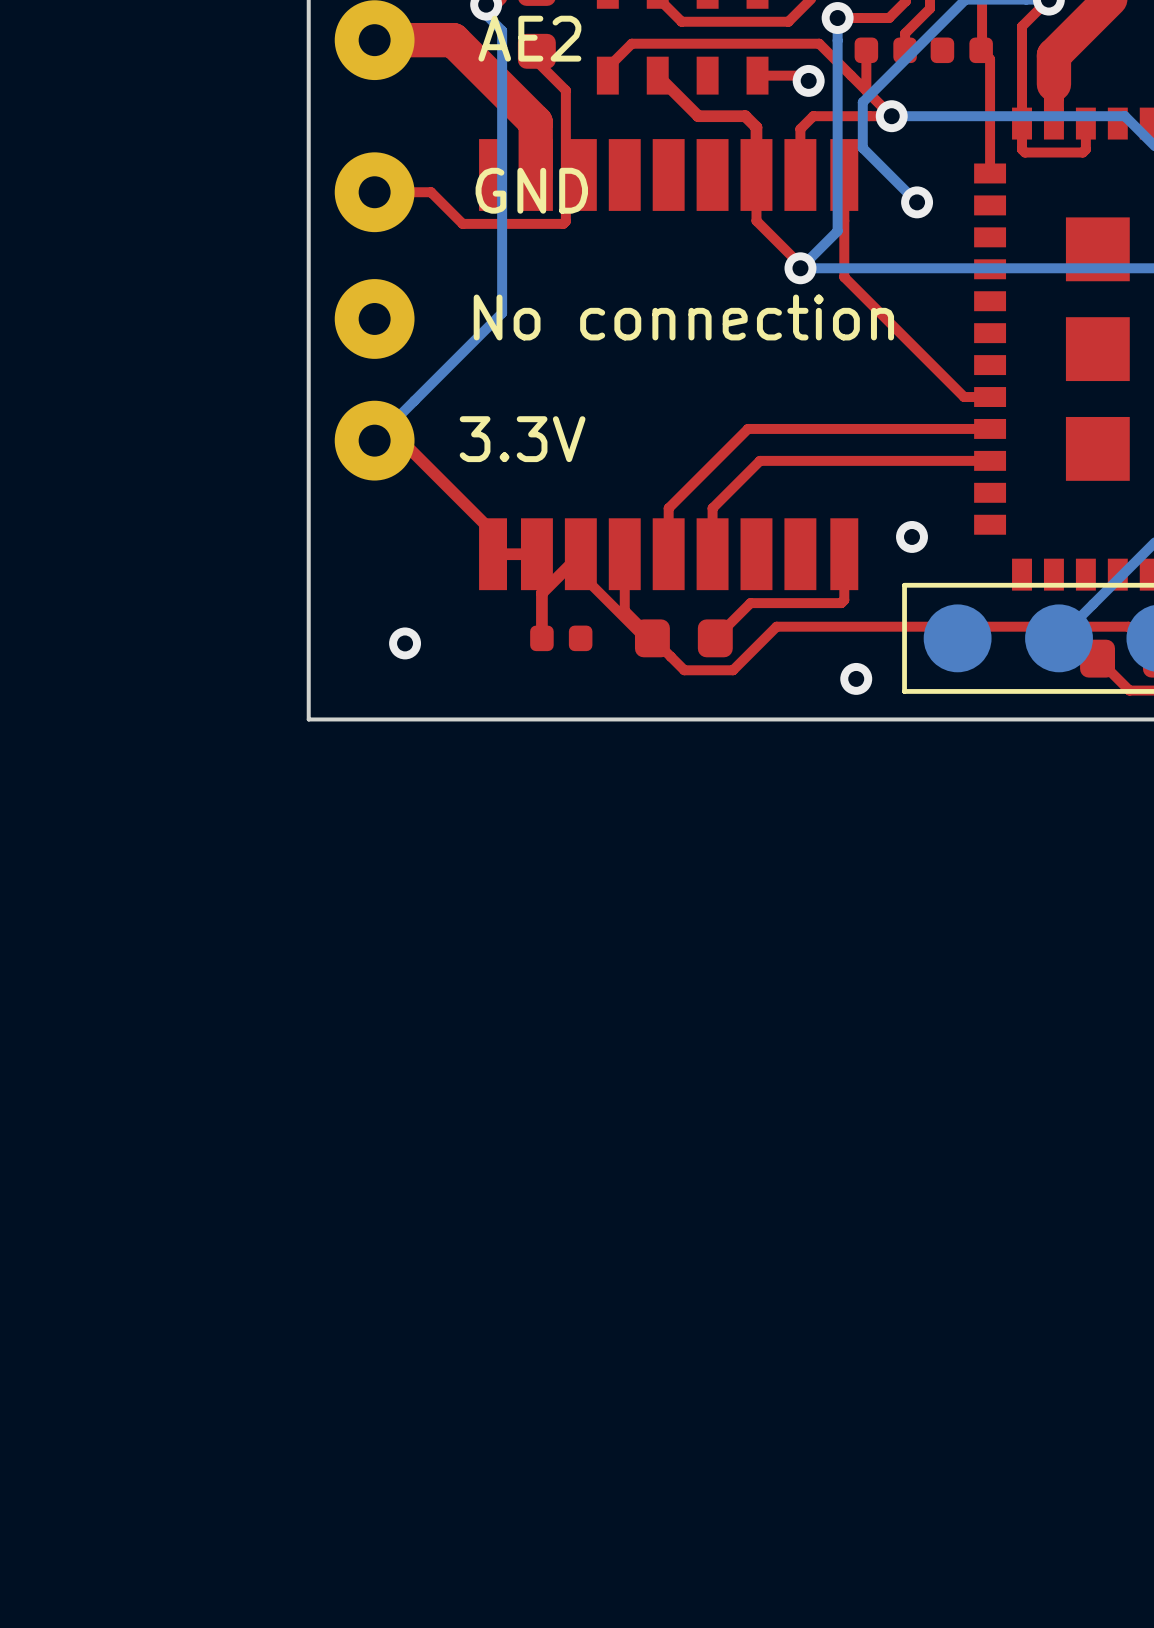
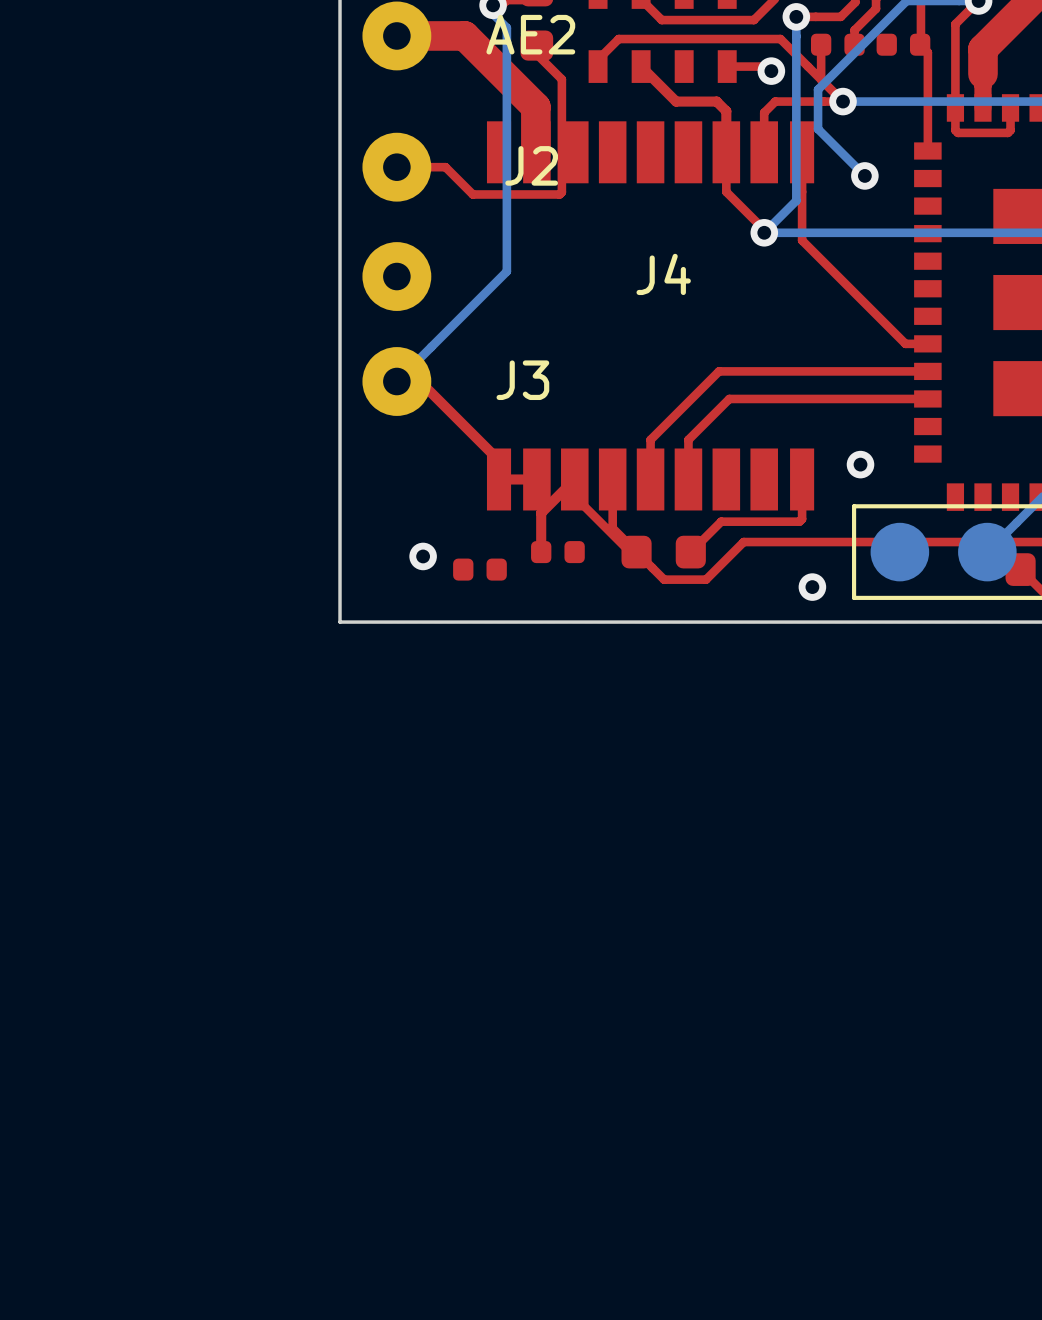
GND name: GND (531, 190) -> J2 (531, 165)
No connection name: No connection (683, 317) -> J4 (663, 274)
3.3V name: 3.3V (522, 439) -> J3 (522, 380)
part: none -> (479, 569)

